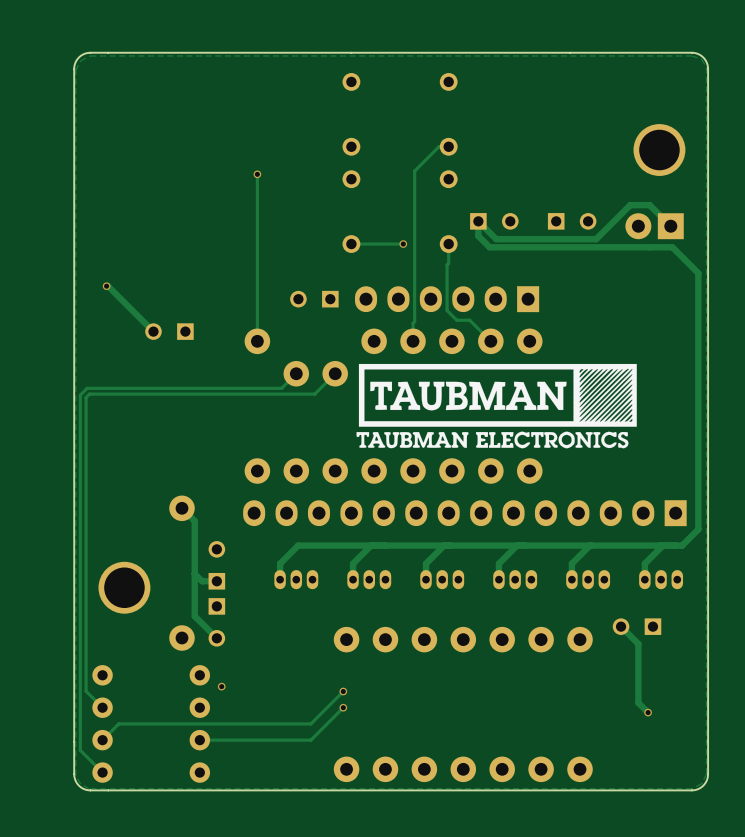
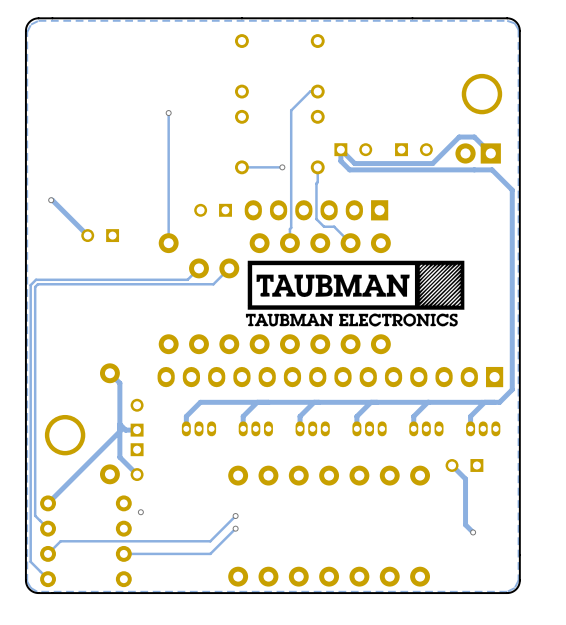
track: none -> (119, 431) (48, 503)

